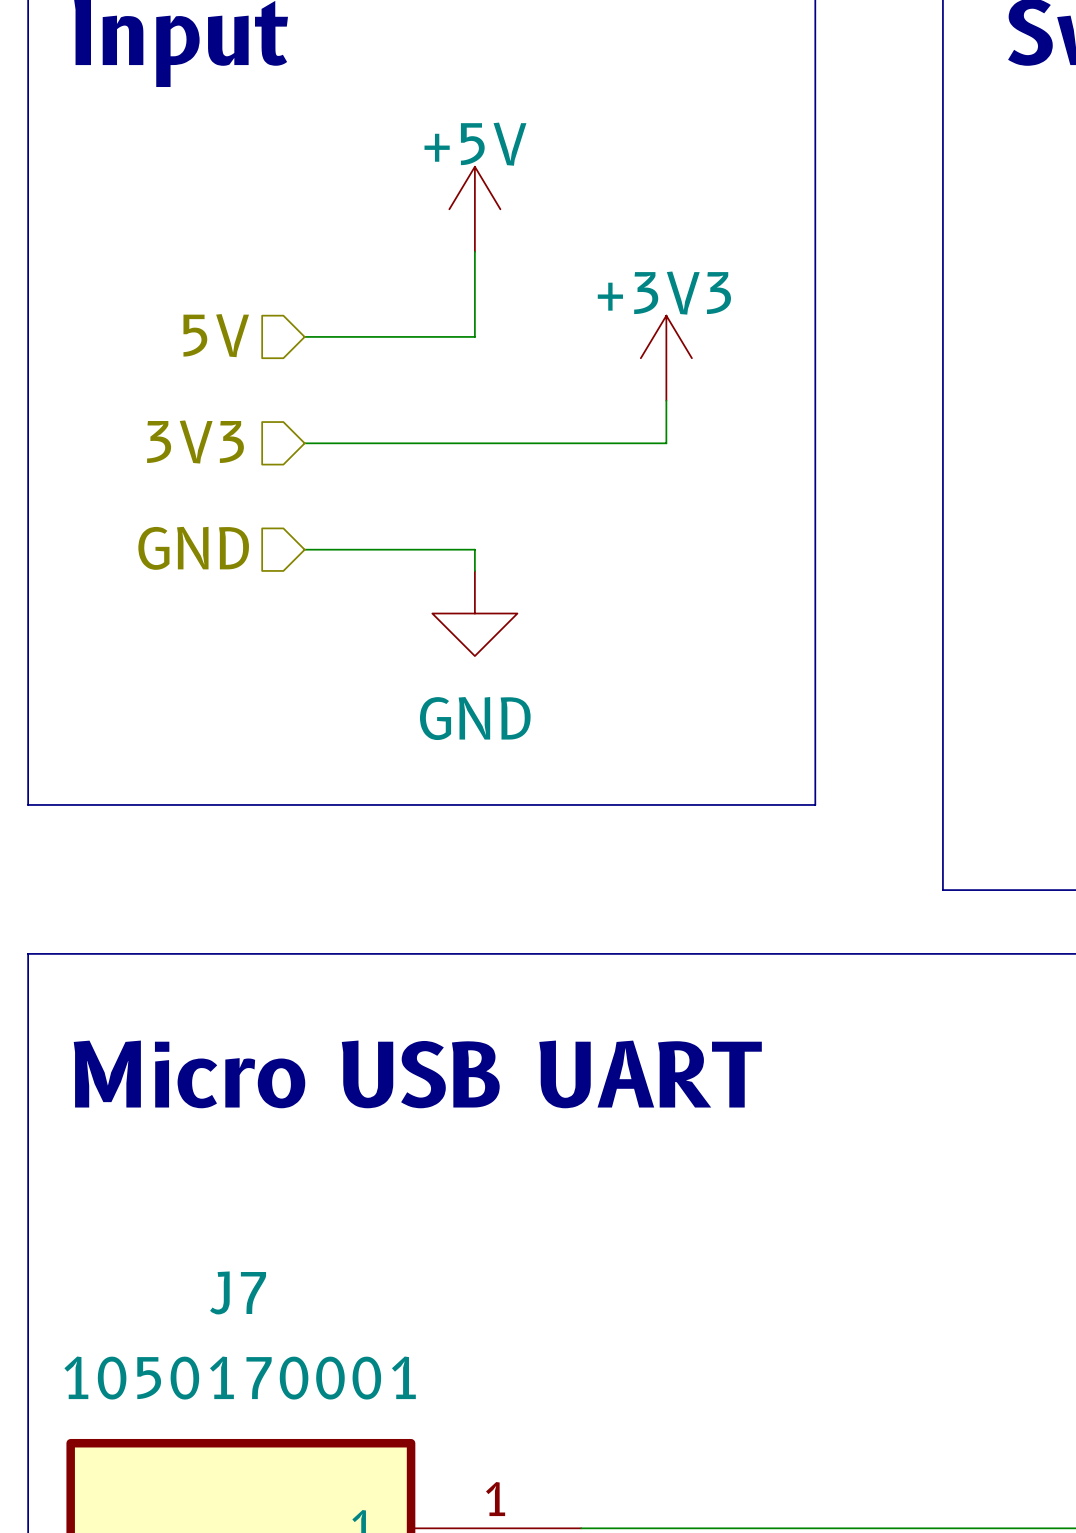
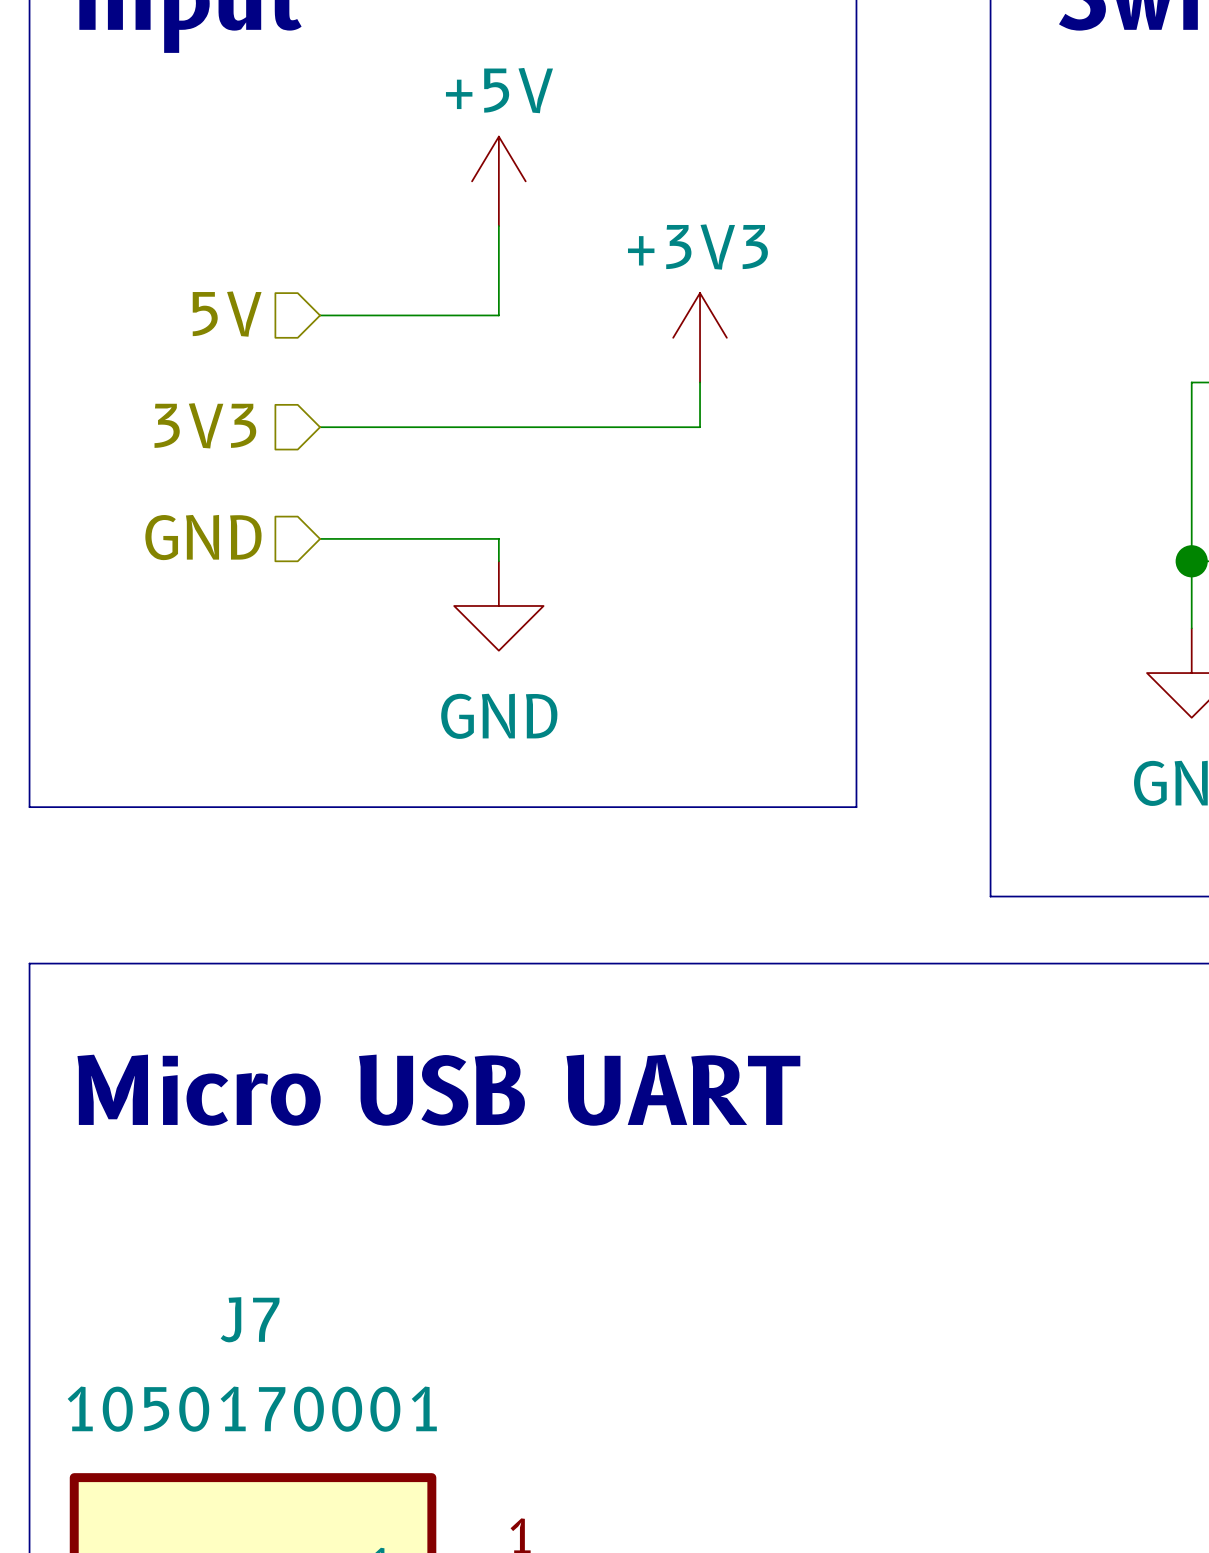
power symbol text position: +5V (475, 144) -> +5V (499, 90)
power symbol text position: +3V3 (664, 293) -> +3V3 (697, 247)

